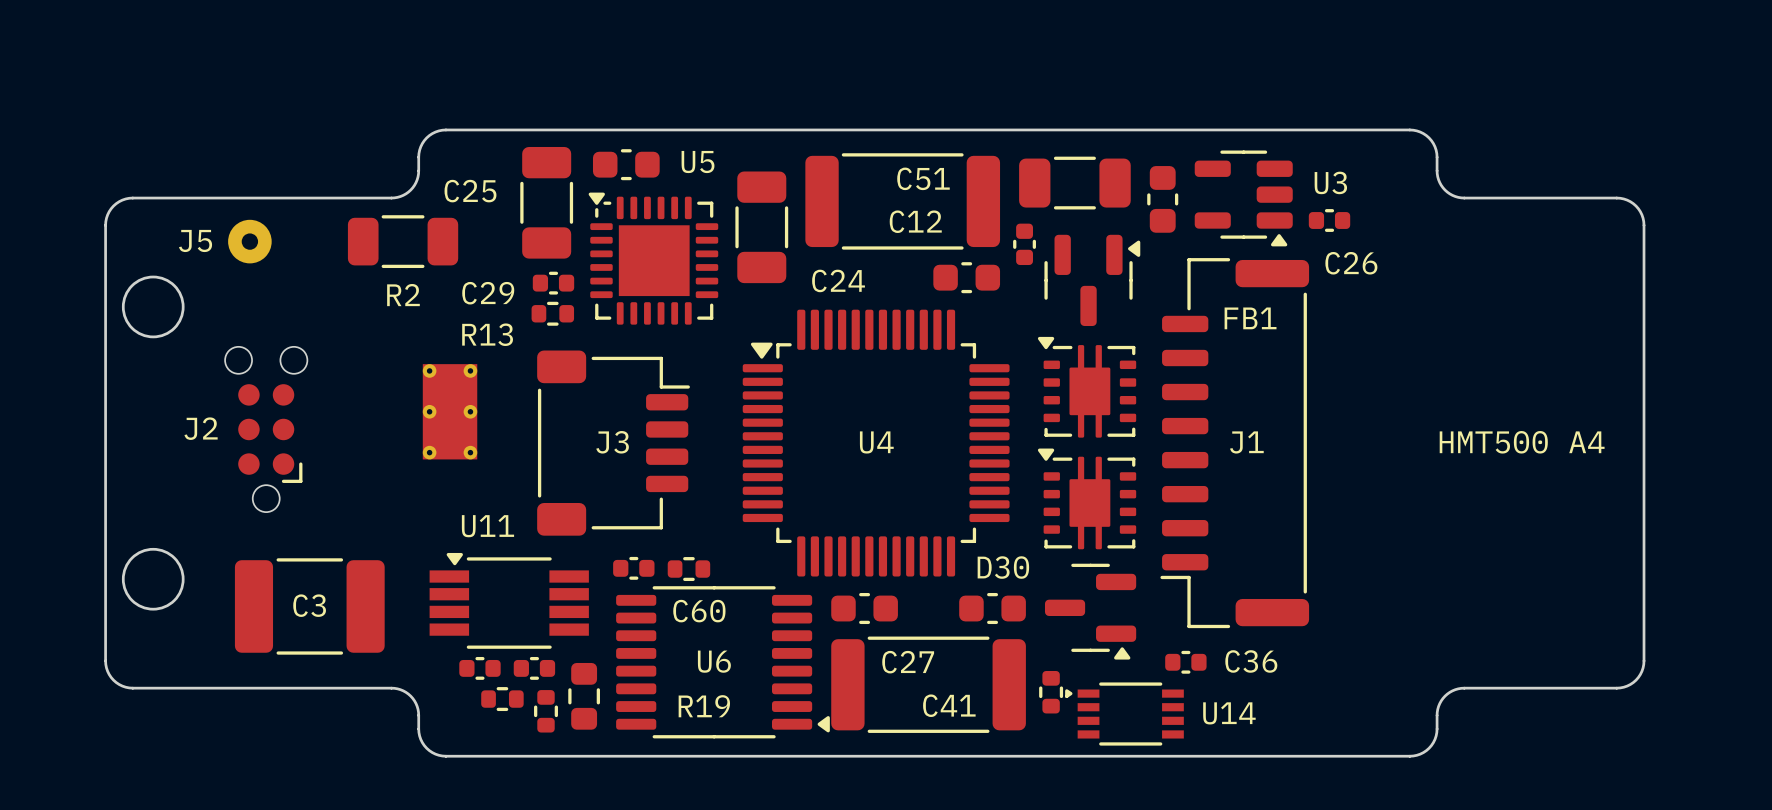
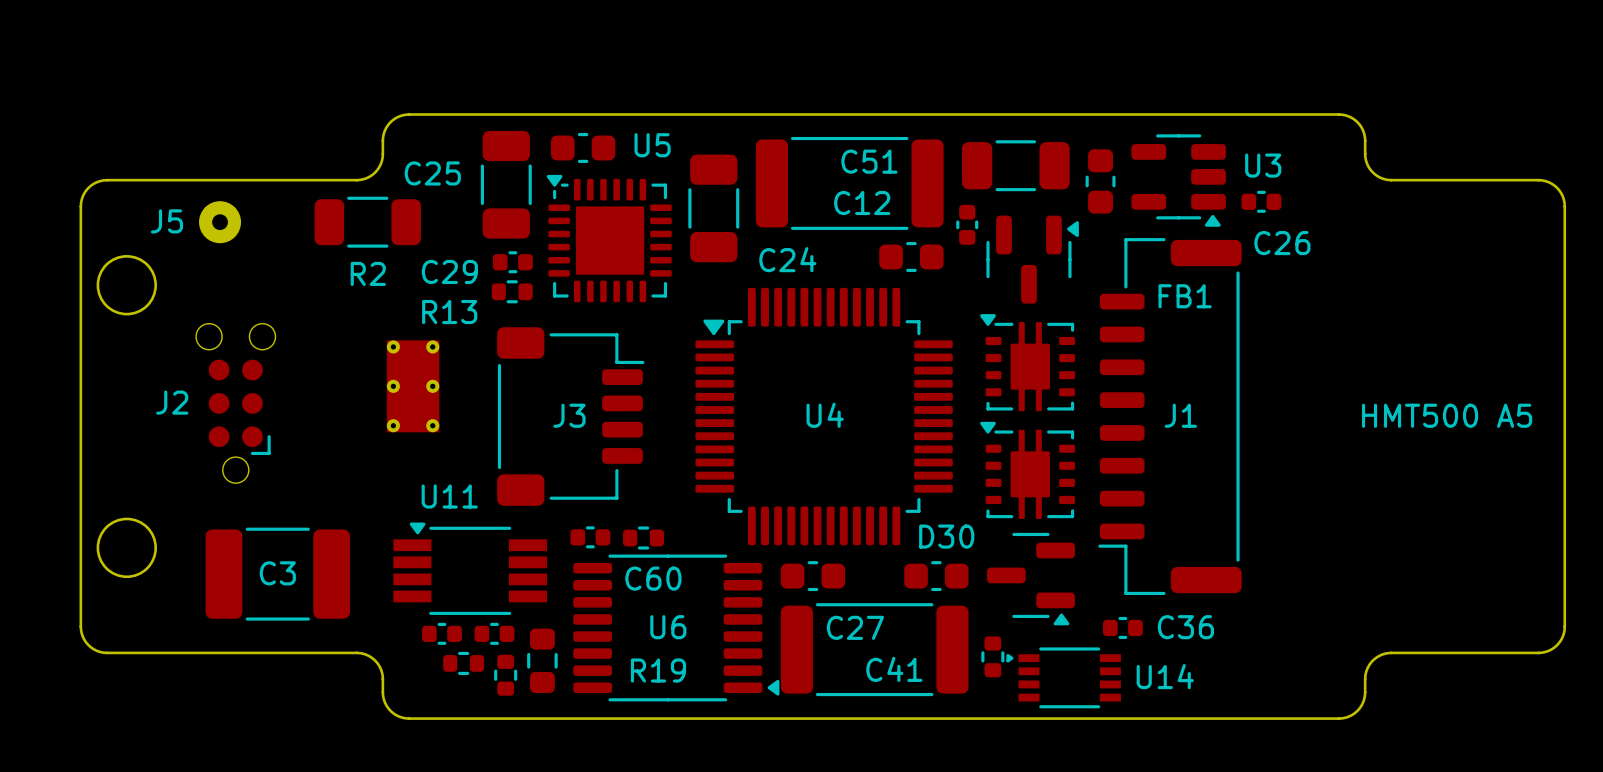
text: HMT500 A4 (1522, 442) -> HMT500 A5 (1447, 415)

